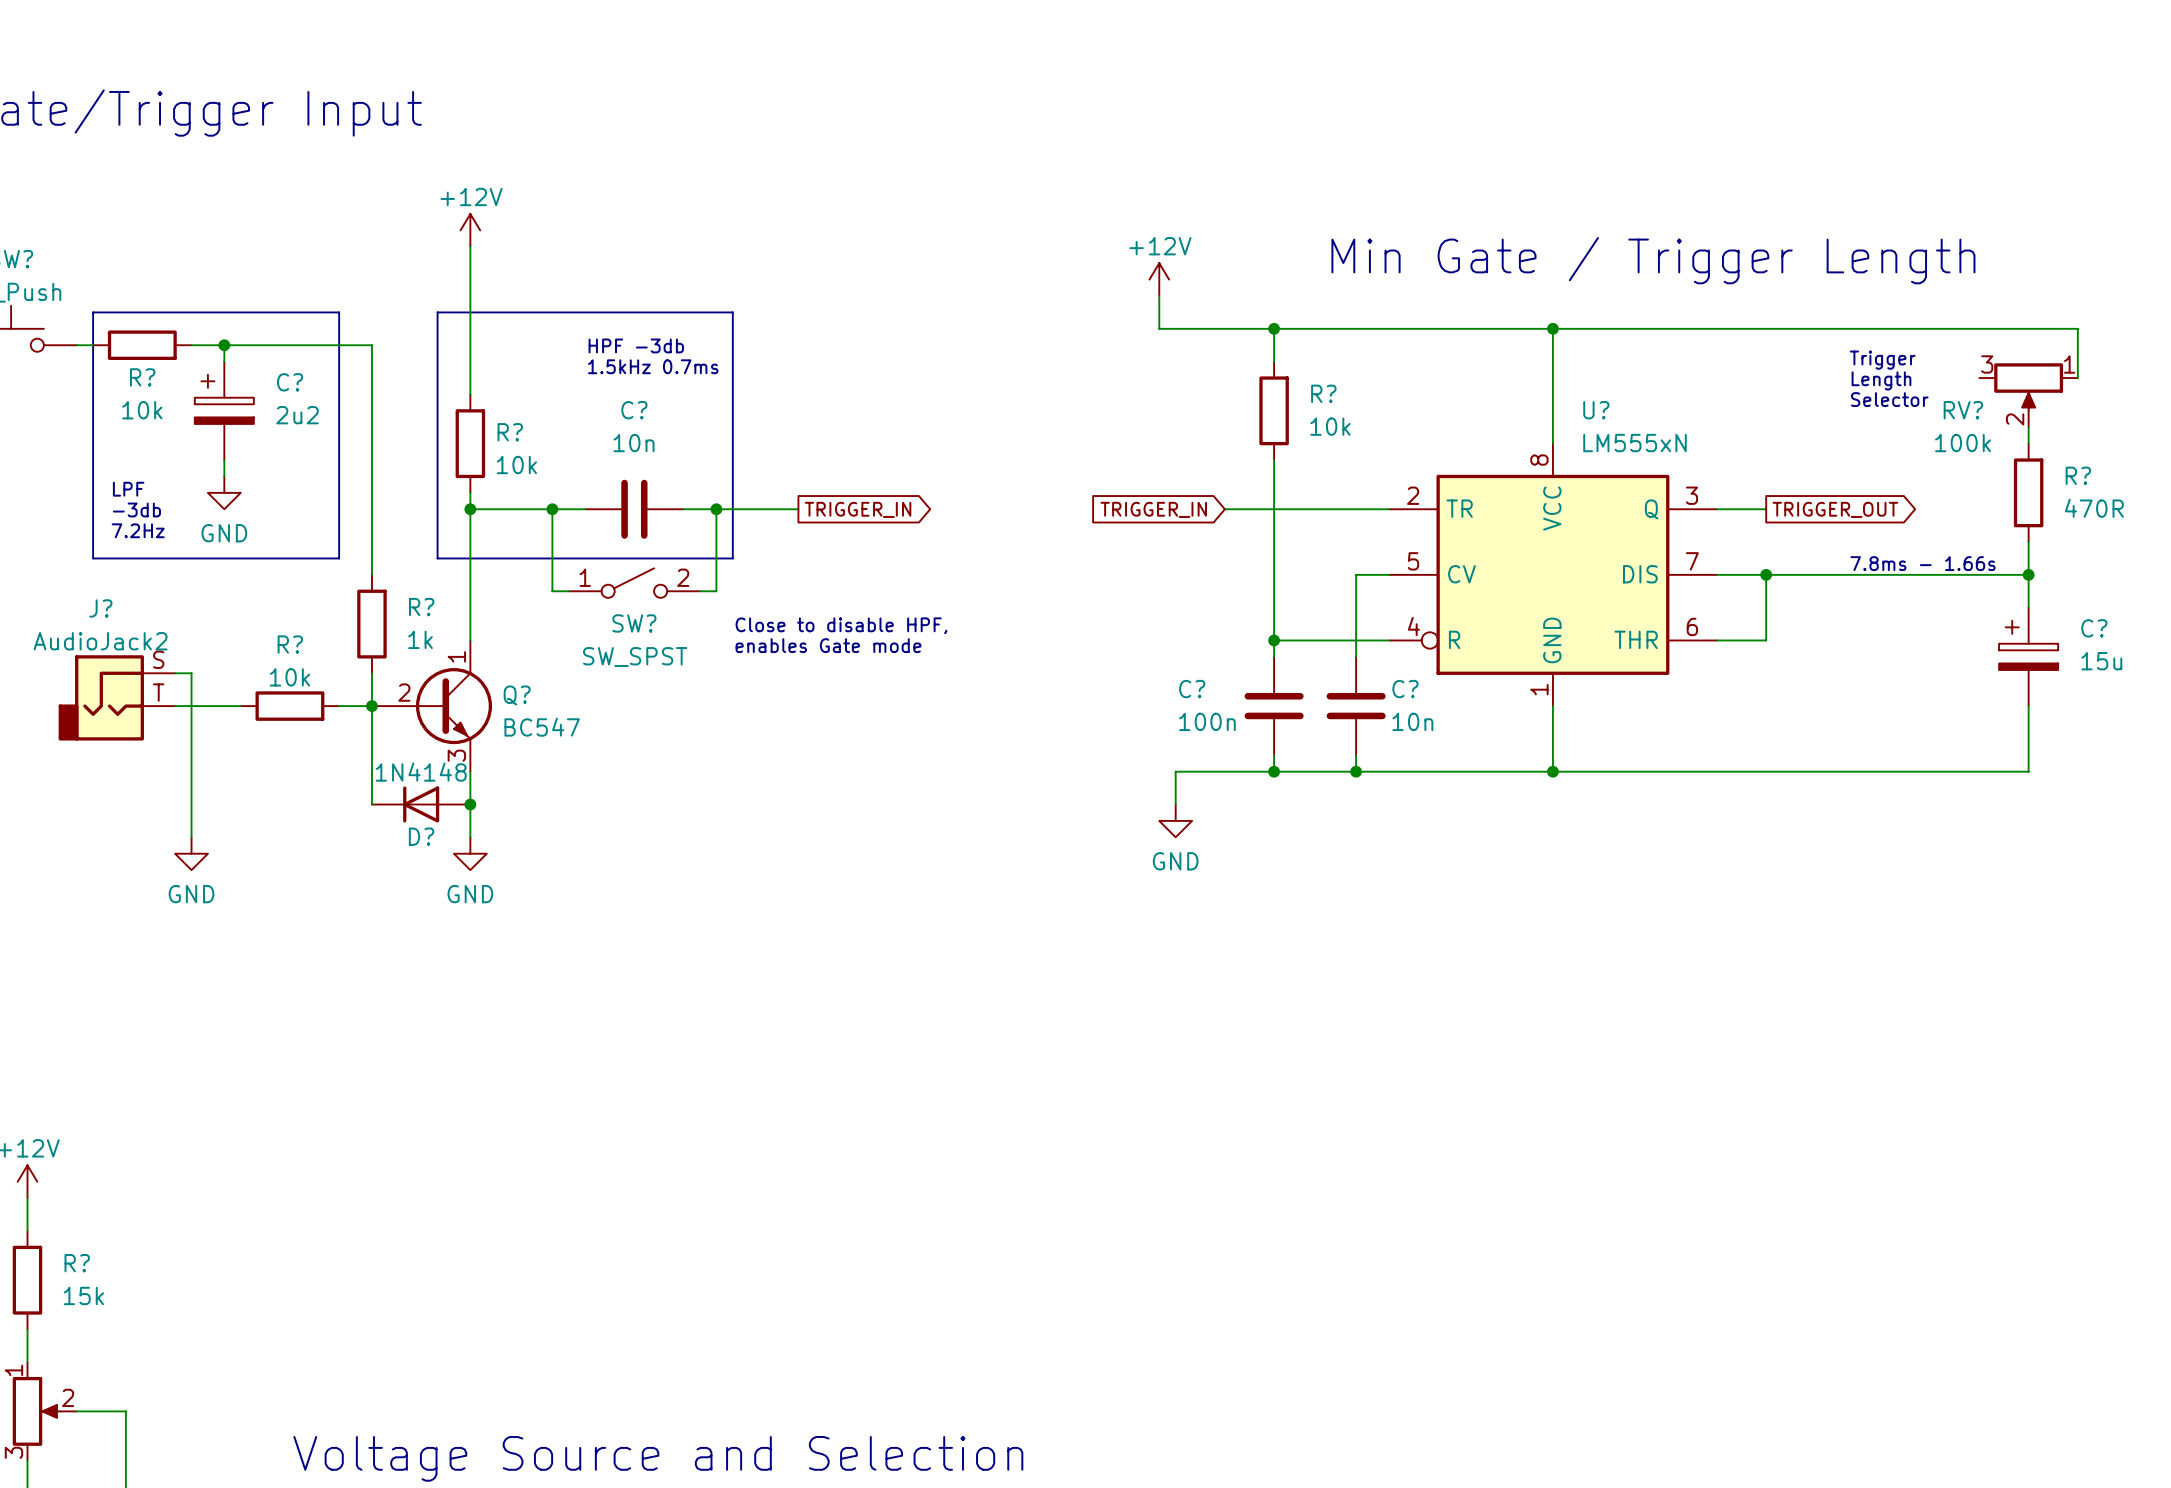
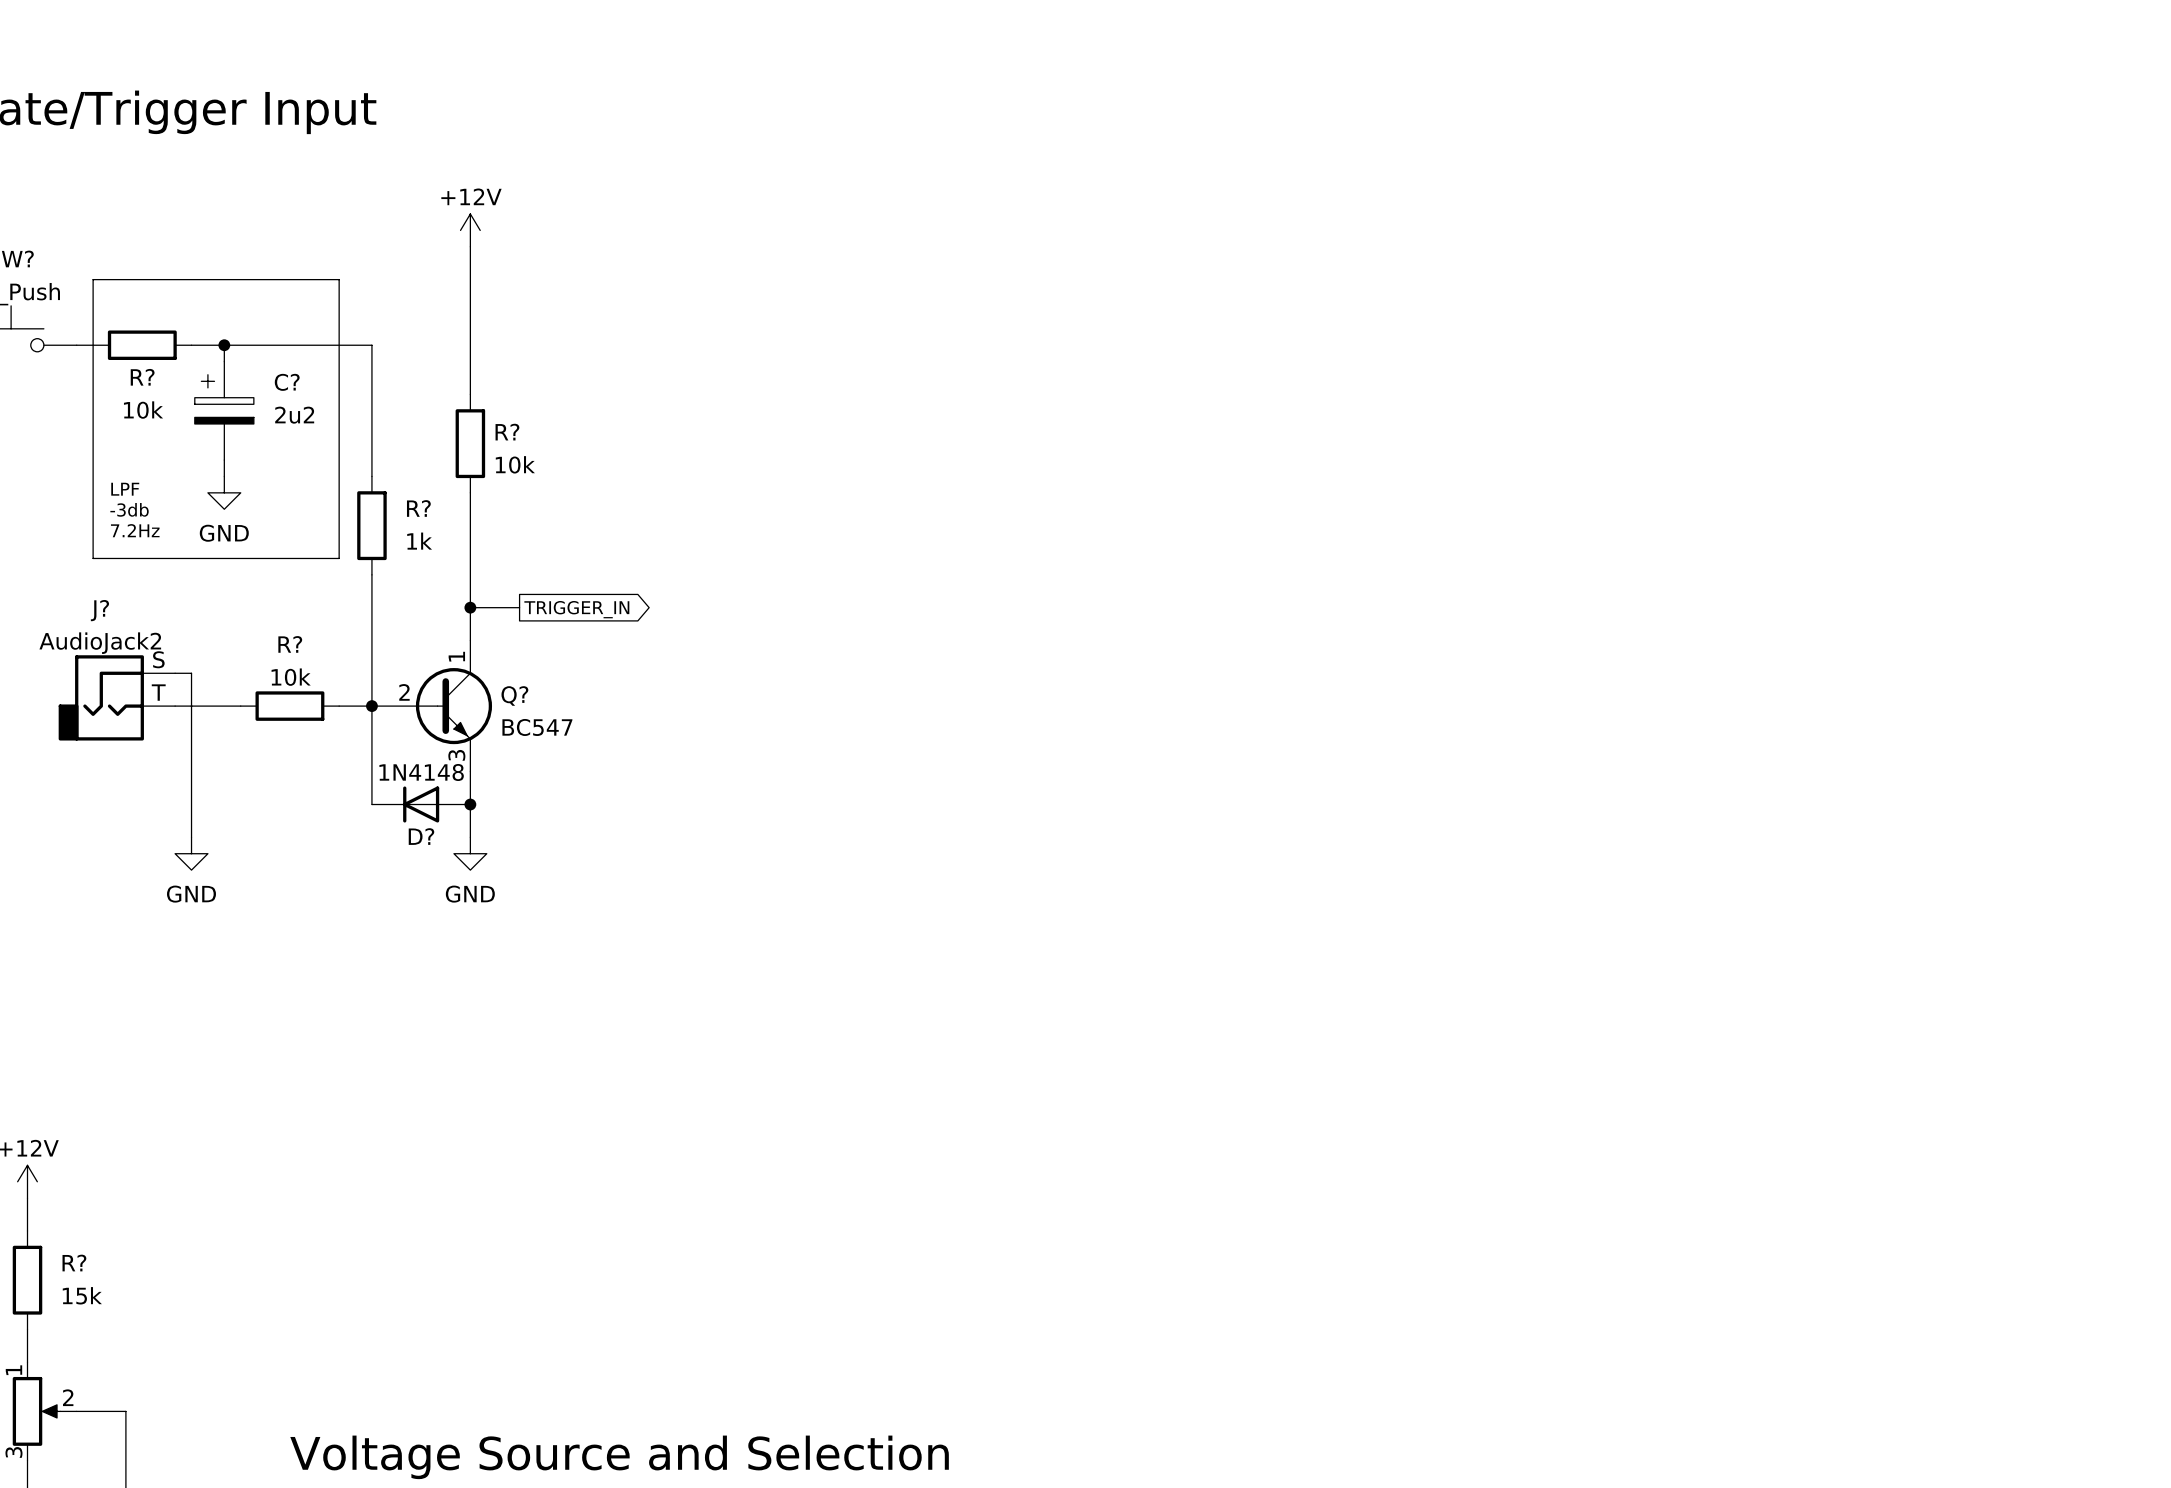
text: Min Gate / Trigger Length (1653, 260) -> none
power symbol: +12V (1159, 279) -> none
wire: (1159, 296) (1159, 328) (2077, 328) (2077, 378) -> none
line: (93, 312) (339, 312) -> (93, 312) (93, 279) (339, 279) (339, 312)
line: (437, 312) (732, 312) (732, 558) (437, 558) (437, 312) -> none
wire: (1274, 328) (1274, 361) -> none
junction: (1274, 328) -> none
wire: (1552, 328) (1552, 443) -> none
junction: (1552, 328) -> none
text: HPF -3db (636, 345) -> none
text: Trigger (1882, 360) -> none
text: 1.5kHz 0.7ms (653, 366) -> none
text: Length (1881, 380) -> none
RV?: 100k (2028, 395) -> none
text: Selector (1889, 399) -> none
R?: 10k (1274, 410) -> none
wire: (2028, 427) (2028, 443) -> none
wire: (1274, 460) (1274, 656) -> none
wire: (371, 476) (371, 574) -> (371, 673) (371, 574)
R?: 470R (2028, 492) -> none
wire: (470, 509) (585, 509) -> none
junction: (470, 509) -> none
wire: (552, 509) (552, 591) (568, 591) -> none
junction: (552, 509) -> none
C?: 10n (634, 509) -> none
wire: (683, 509) (798, 509) -> none
wire: (716, 509) (716, 591) (700, 591) -> none
junction: (716, 509) -> none
global label position: TRIGGER_IN (858, 509) -> TRIGGER_IN (576, 609)
global label: TRIGGER_IN (1153, 509) -> none
wire: (1224, 509) (1388, 509) -> none
wire: (1716, 509) (1766, 509) -> none
global label: TRIGGER_OUT (1835, 509) -> none
wire: (2028, 542) (2028, 607) -> none
text: 7.8ms - 1.66s (1922, 563) -> none
wire: (1388, 574) (1356, 574) (1356, 656) -> none
U?: LM555xN (1552, 574) -> none
wire: (1716, 574) (2028, 574) -> none
wire: (1766, 574) (1766, 640) (1716, 640) -> none
junction: (1766, 574) -> none
junction: (2028, 574) -> none
SW?: SW_SPST (634, 583) -> none
wire: none -> (470, 607) (519, 607)
junction: none -> (470, 607)
R? position: (371, 624) -> (371, 525)
text: Close to disable HPF, (841, 625) -> none
wire: (1274, 640) (1388, 640) -> none
junction: (1274, 640) -> none
text: enables Gate mode (828, 645) -> none
C?: 15u (2028, 656) -> none
C?: 100n (1274, 706) -> none
C?: 10n (1356, 706) -> none
wire: (1552, 706) (1552, 771) -> none
wire: (2028, 706) (2028, 771) (1175, 771) (1175, 804) -> none
wire: (1274, 755) (1274, 771) -> none
wire: (1356, 755) (1356, 771) -> none
junction: (1274, 771) -> none
junction: (1356, 771) -> none
junction: (1552, 771) -> none
power symbol: GND (1175, 820) -> none

